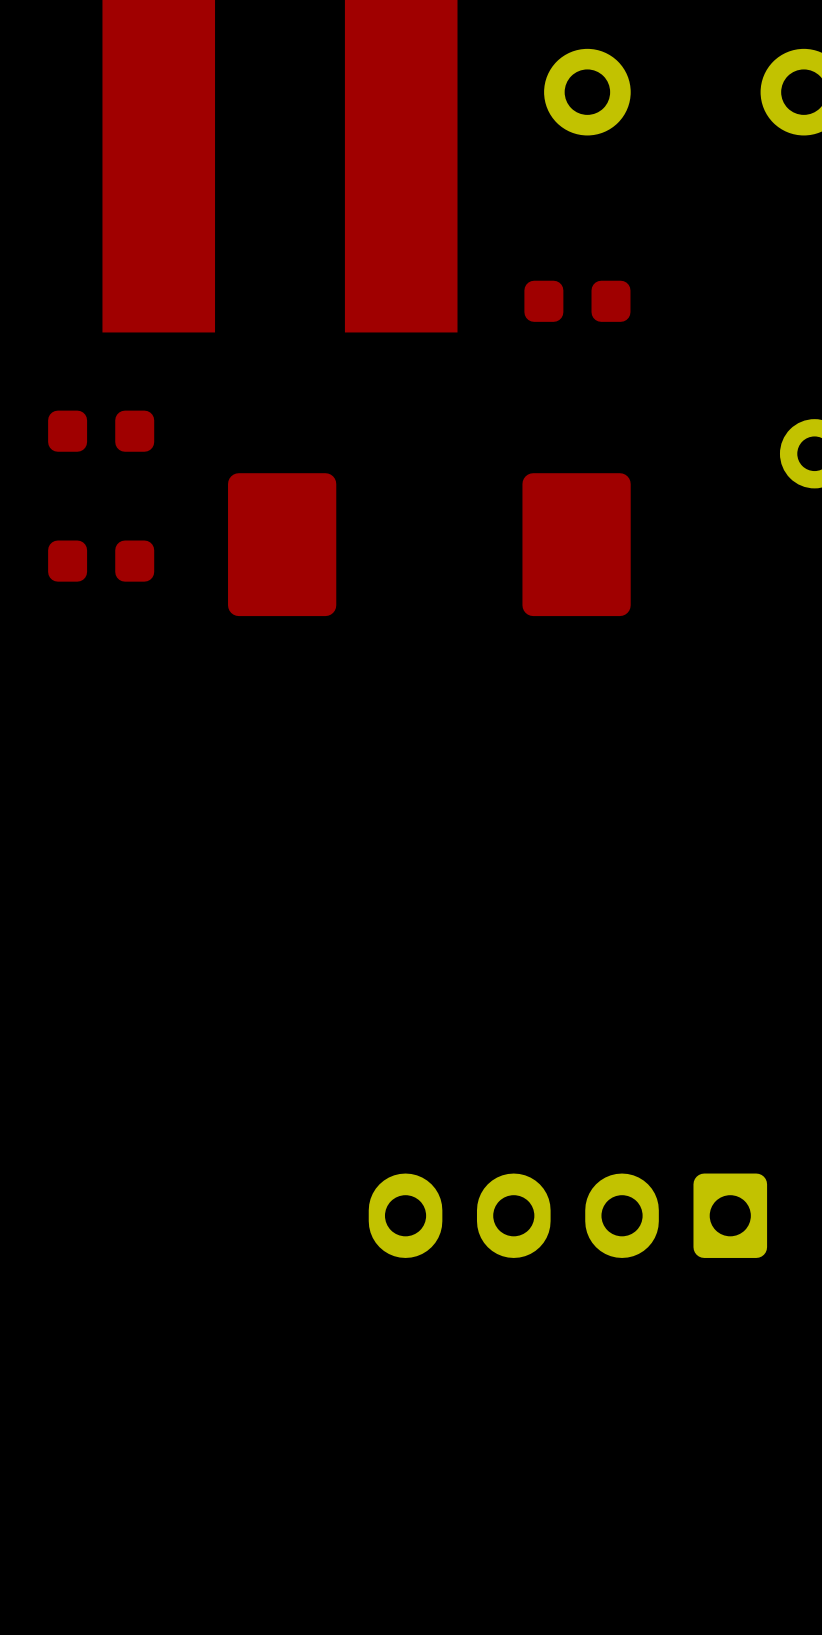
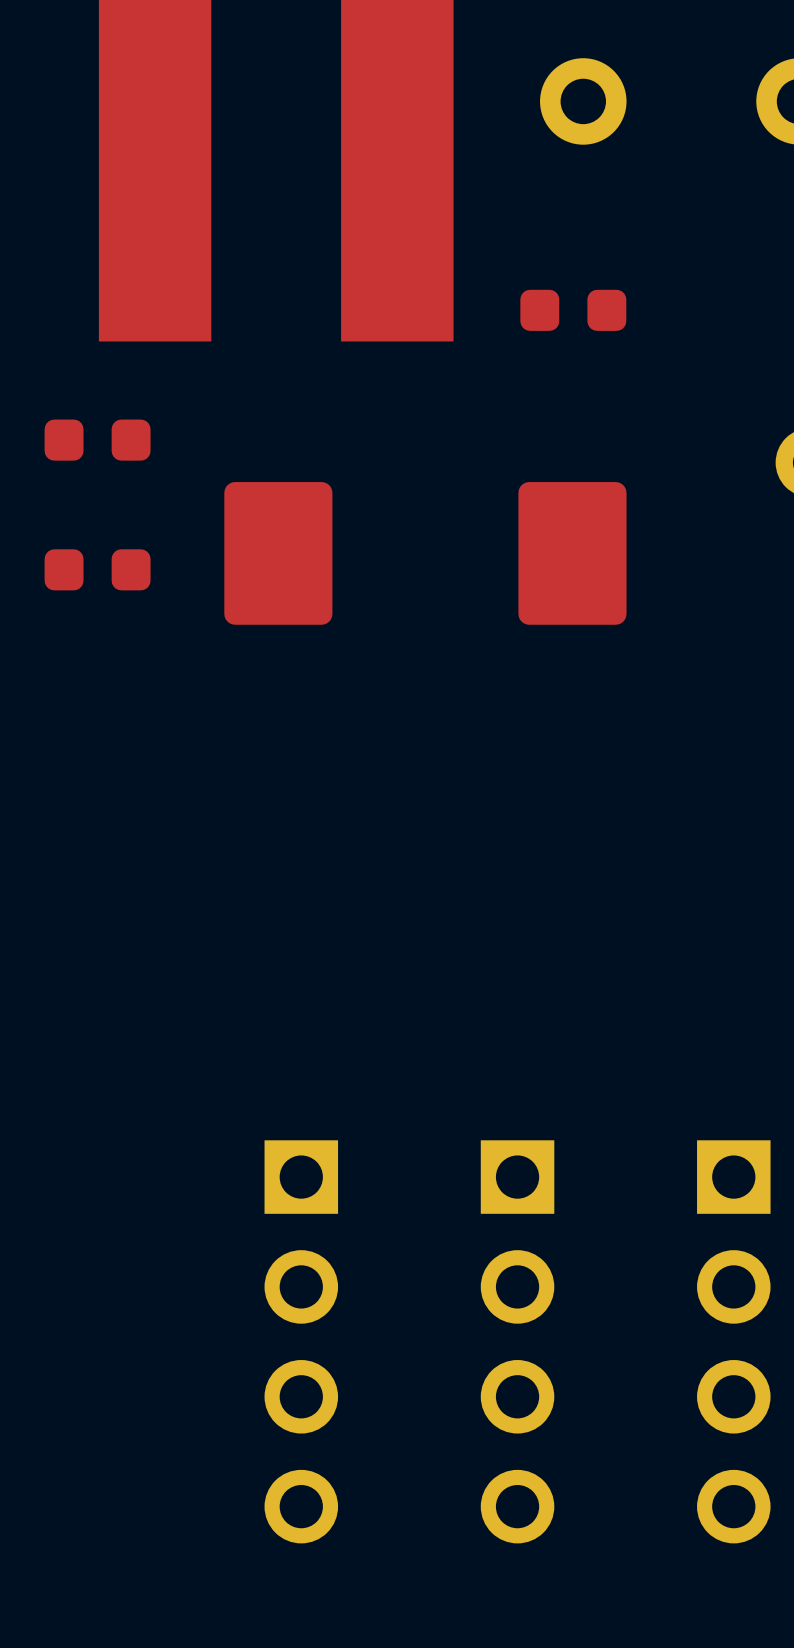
part: (567, 1215) -> none
part: none -> (301, 1341)
part: none -> (517, 1341)
part: none -> (733, 1341)

